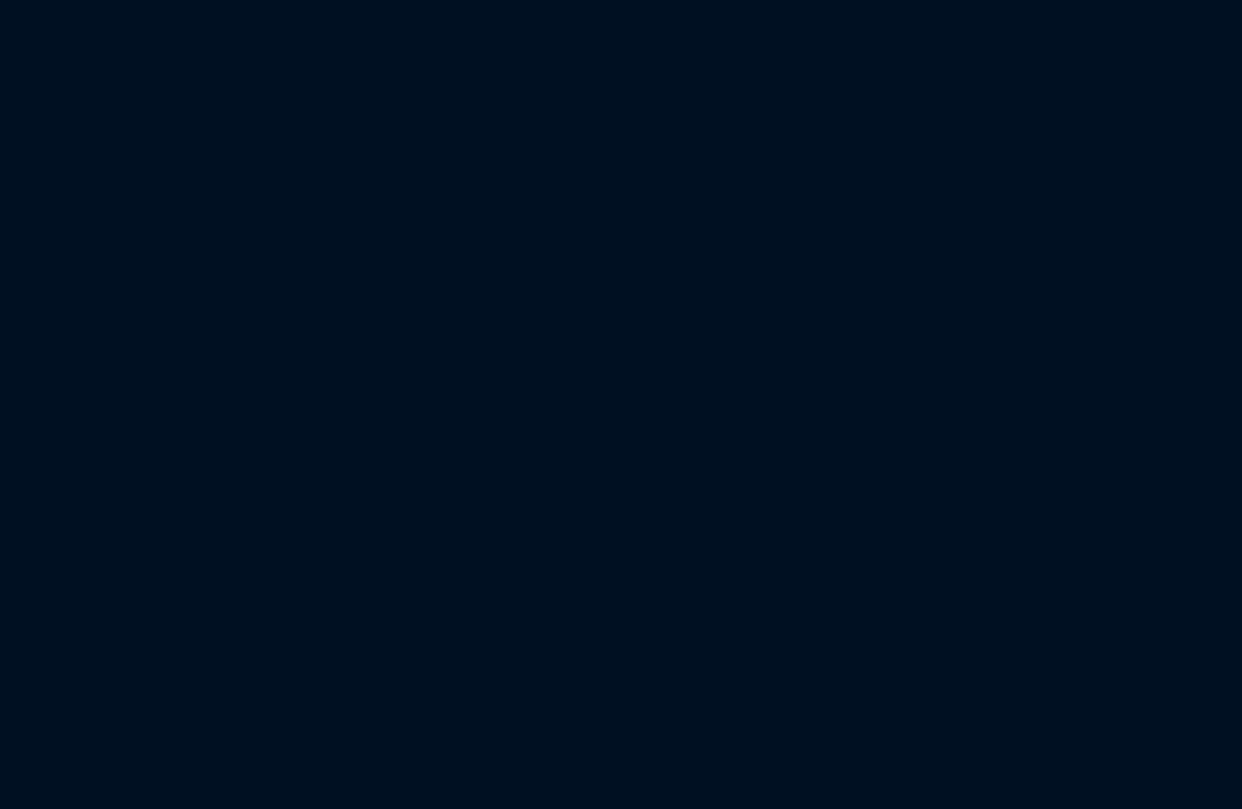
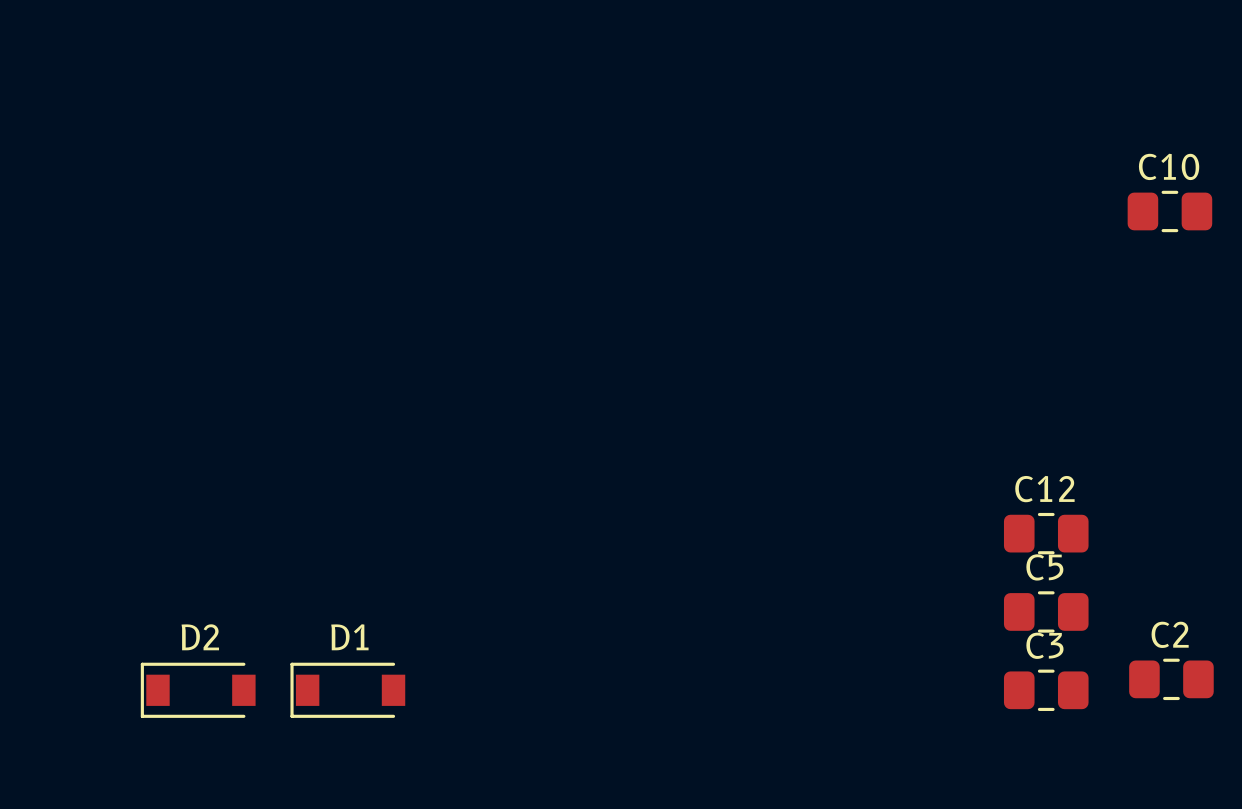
C10: none -> (1169, 211)
C12: none -> (1046, 533)
C5: none -> (1046, 611)
C2: none -> (1171, 679)
D2: none -> (198, 690)
D1: none -> (347, 690)
C3: none -> (1046, 690)

